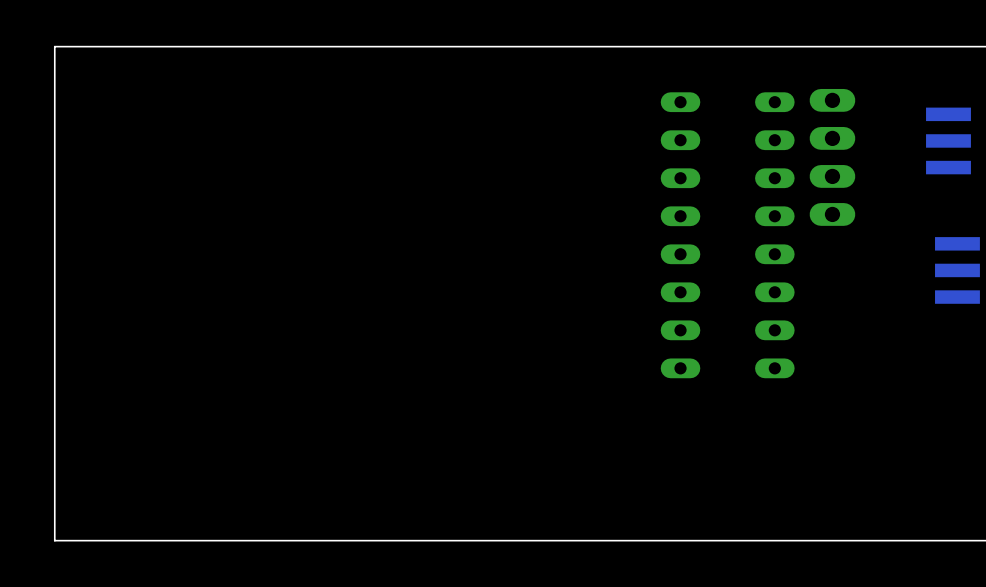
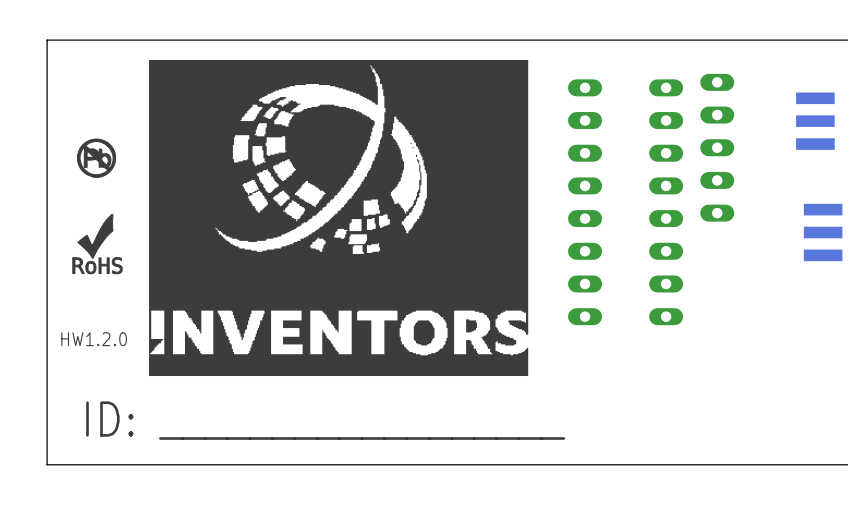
drawing: none -> [149, 60, 529, 377]
part footprint: [809, 88, 856, 226] -> [700, 73, 735, 222]
drawing: none -> [76, 138, 117, 178]
drawing: none -> [72, 213, 123, 275]
text: none -> HW1.2.0 (94, 339)
text: none -> ID: __________________ (325, 420)

